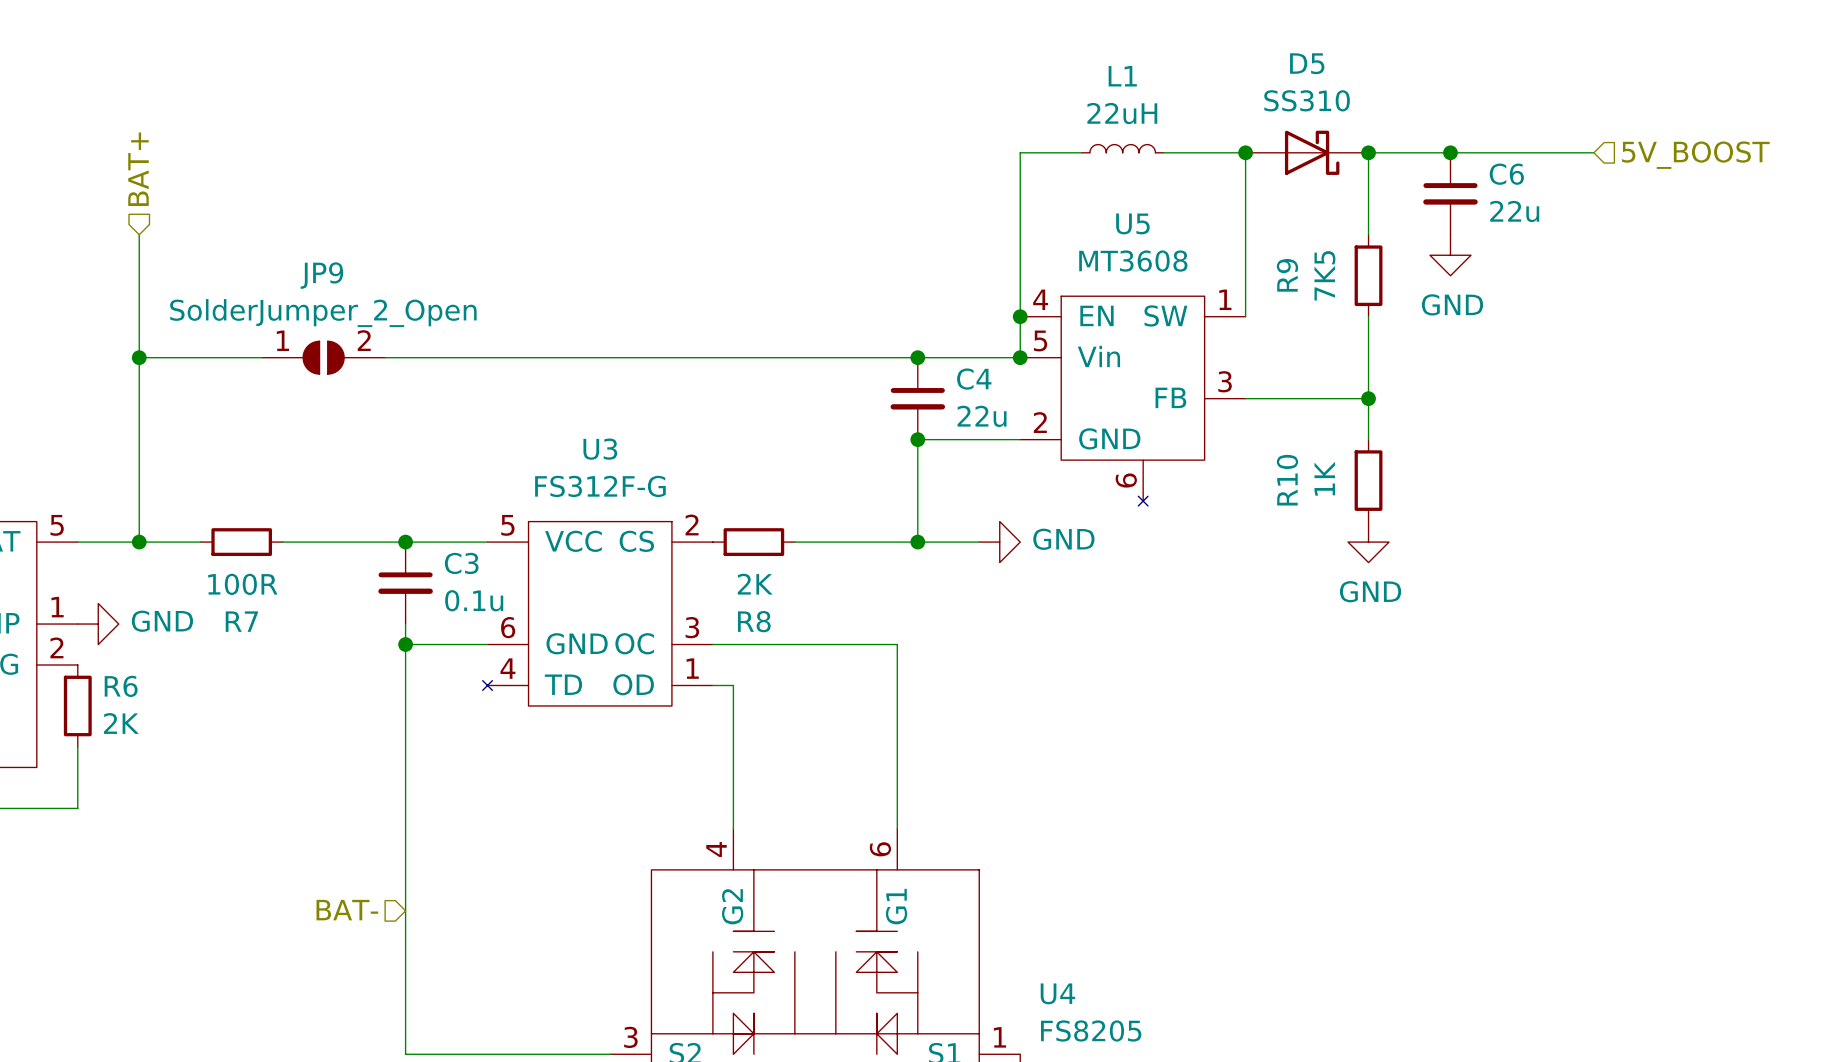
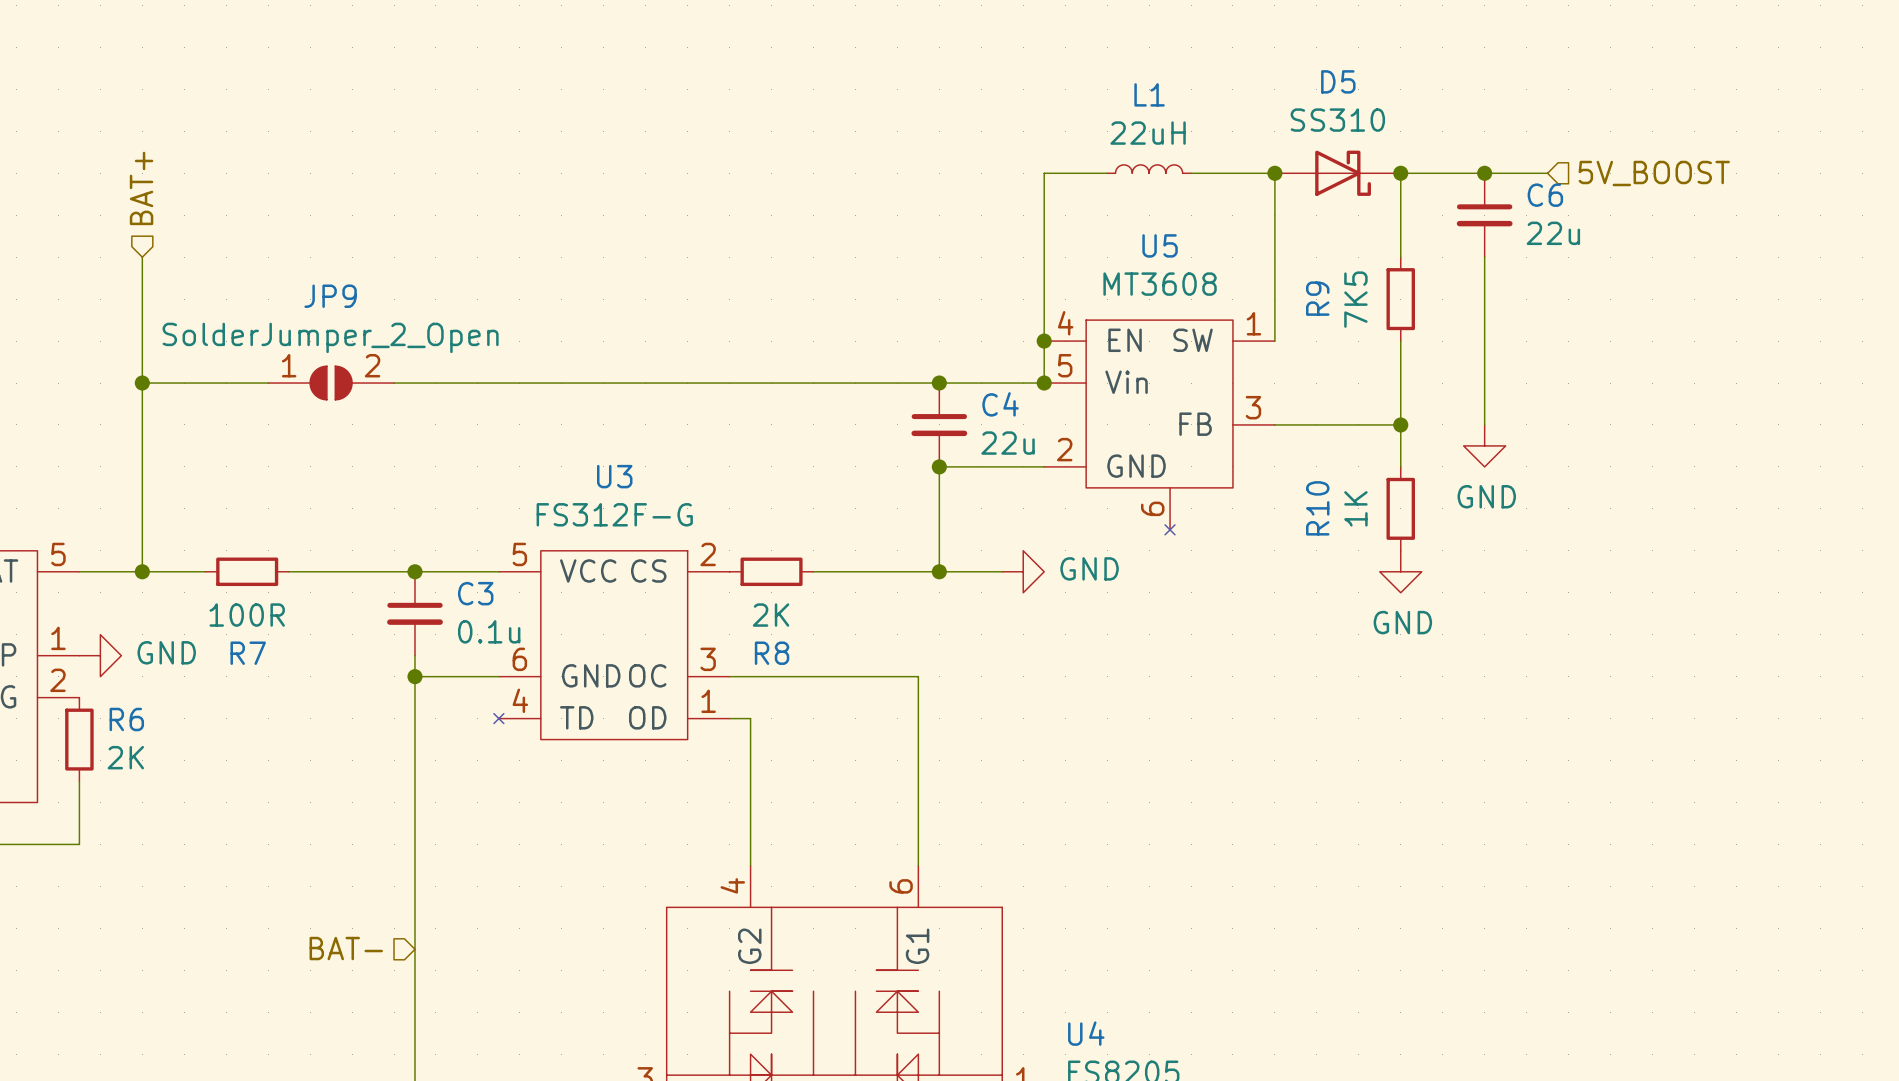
wire: (1511, 152) (1593, 152) -> none
hierarchical label position: 5V_BOOST (1695, 155) -> 5V_BOOST (1654, 173)
wire: none -> (1484, 257) (1484, 424)
power symbol position: GND (1450, 255) -> GND (1484, 445)

